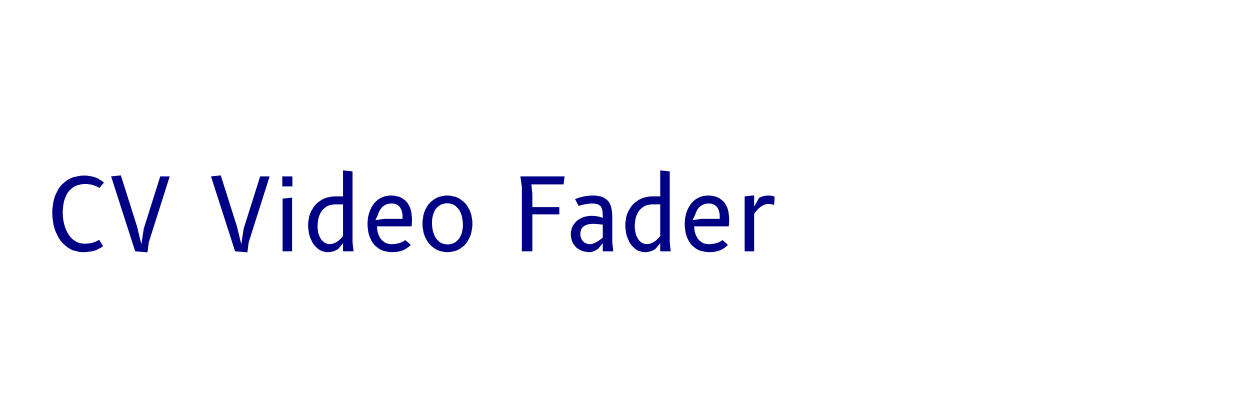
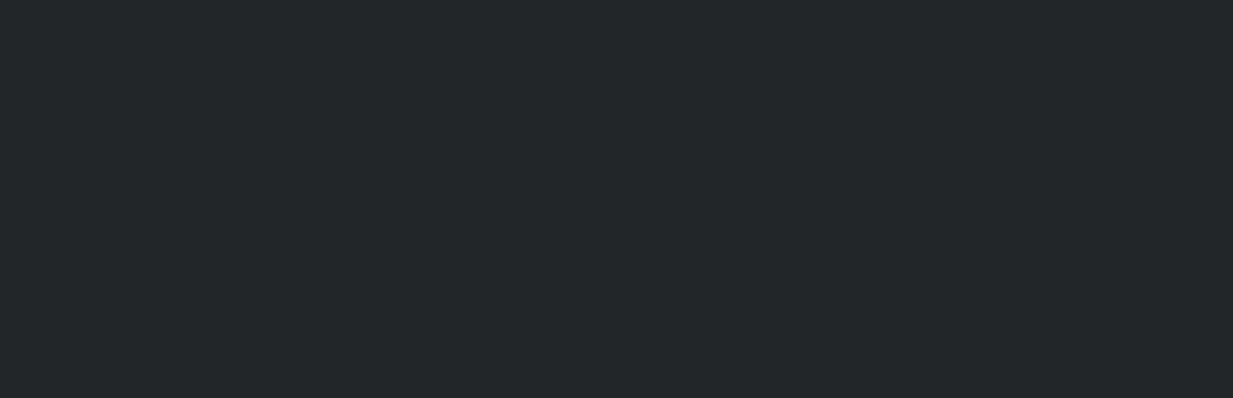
text: CV Video Fader (413, 211) -> none

